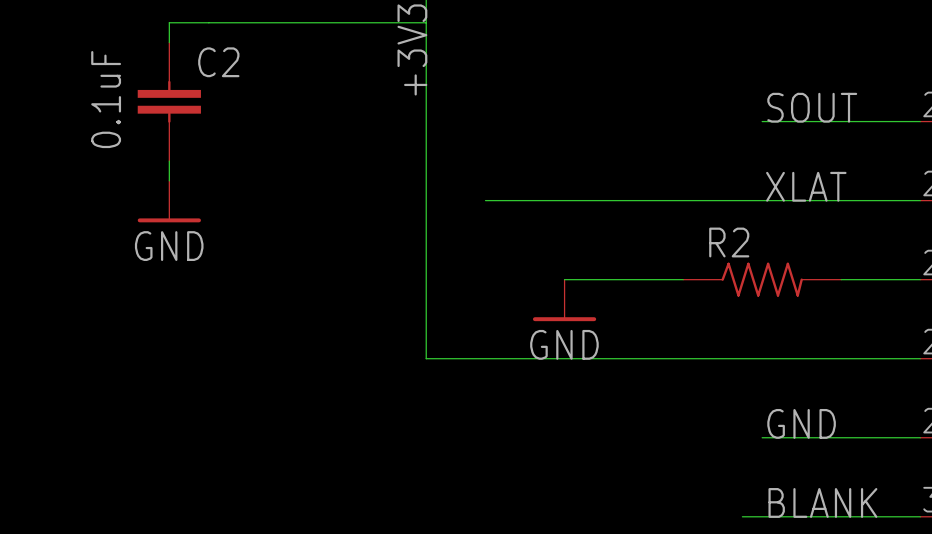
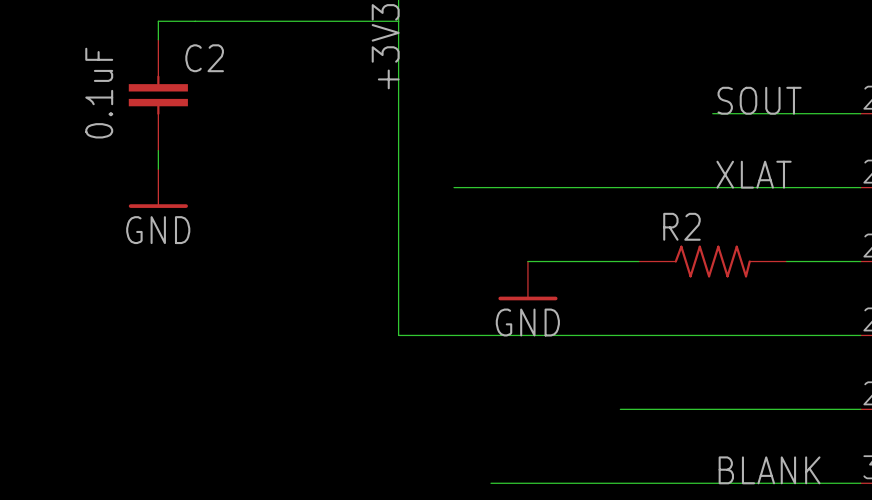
label: GND (801, 423) -> none
wire: none -> (620, 409) (712, 409)
wire: none -> (491, 483) (694, 483)

